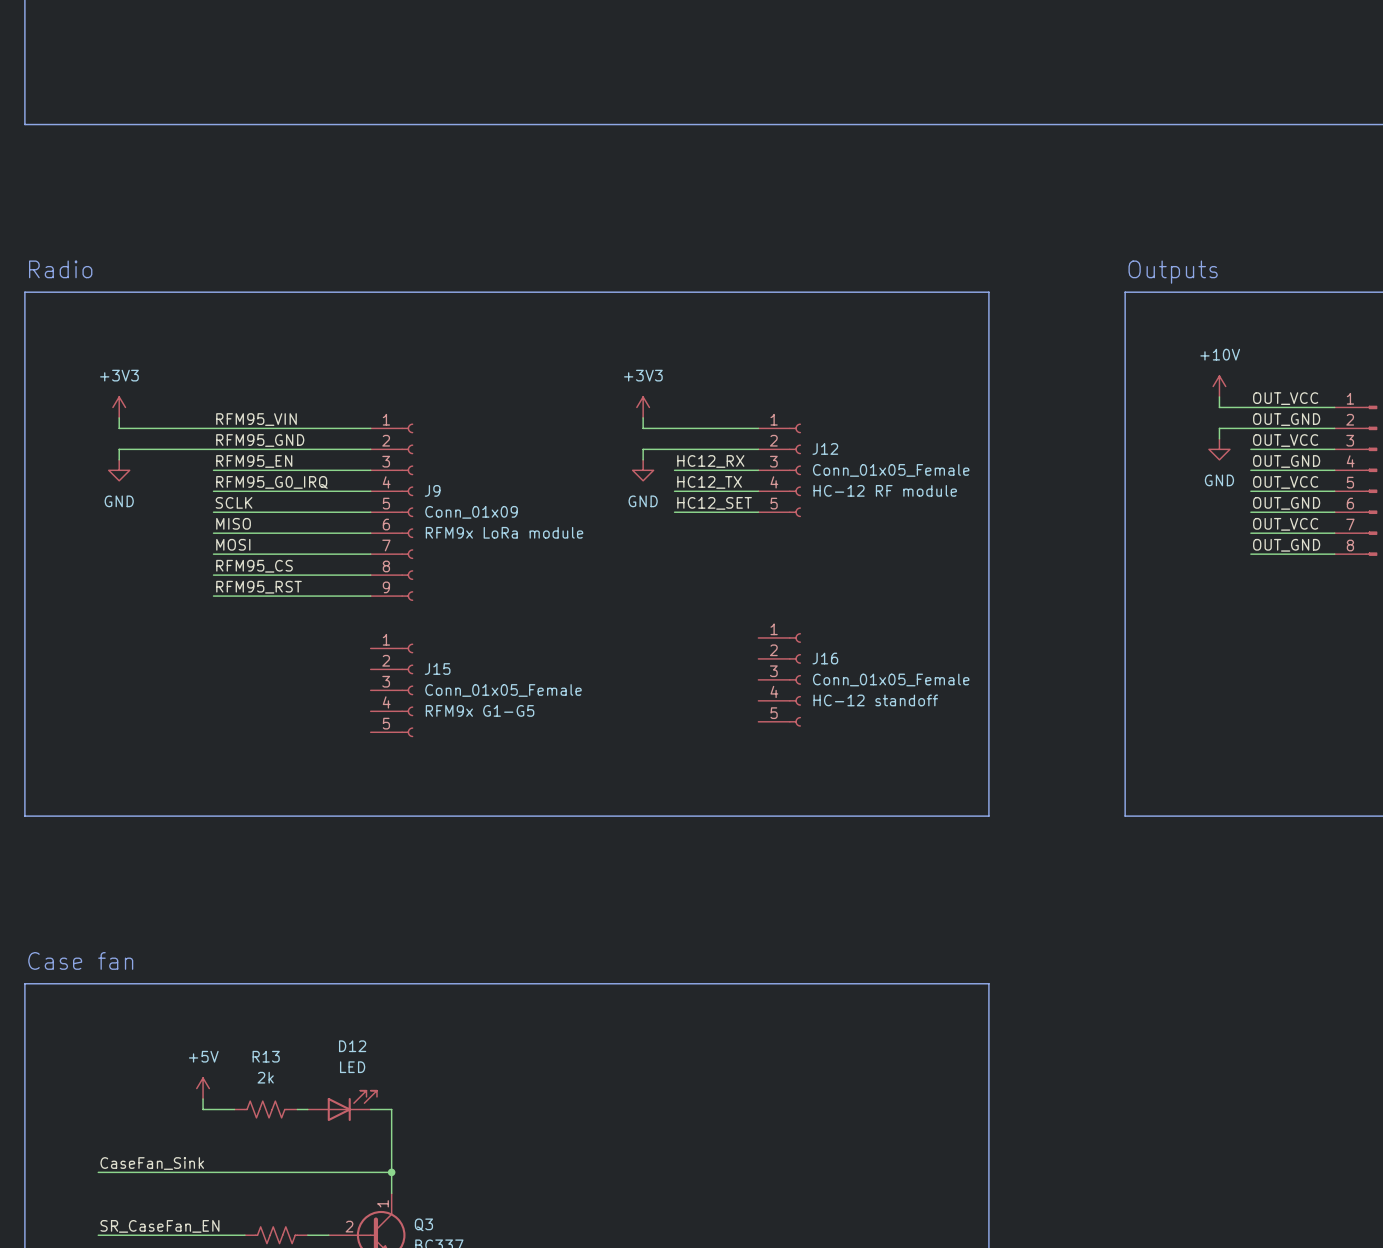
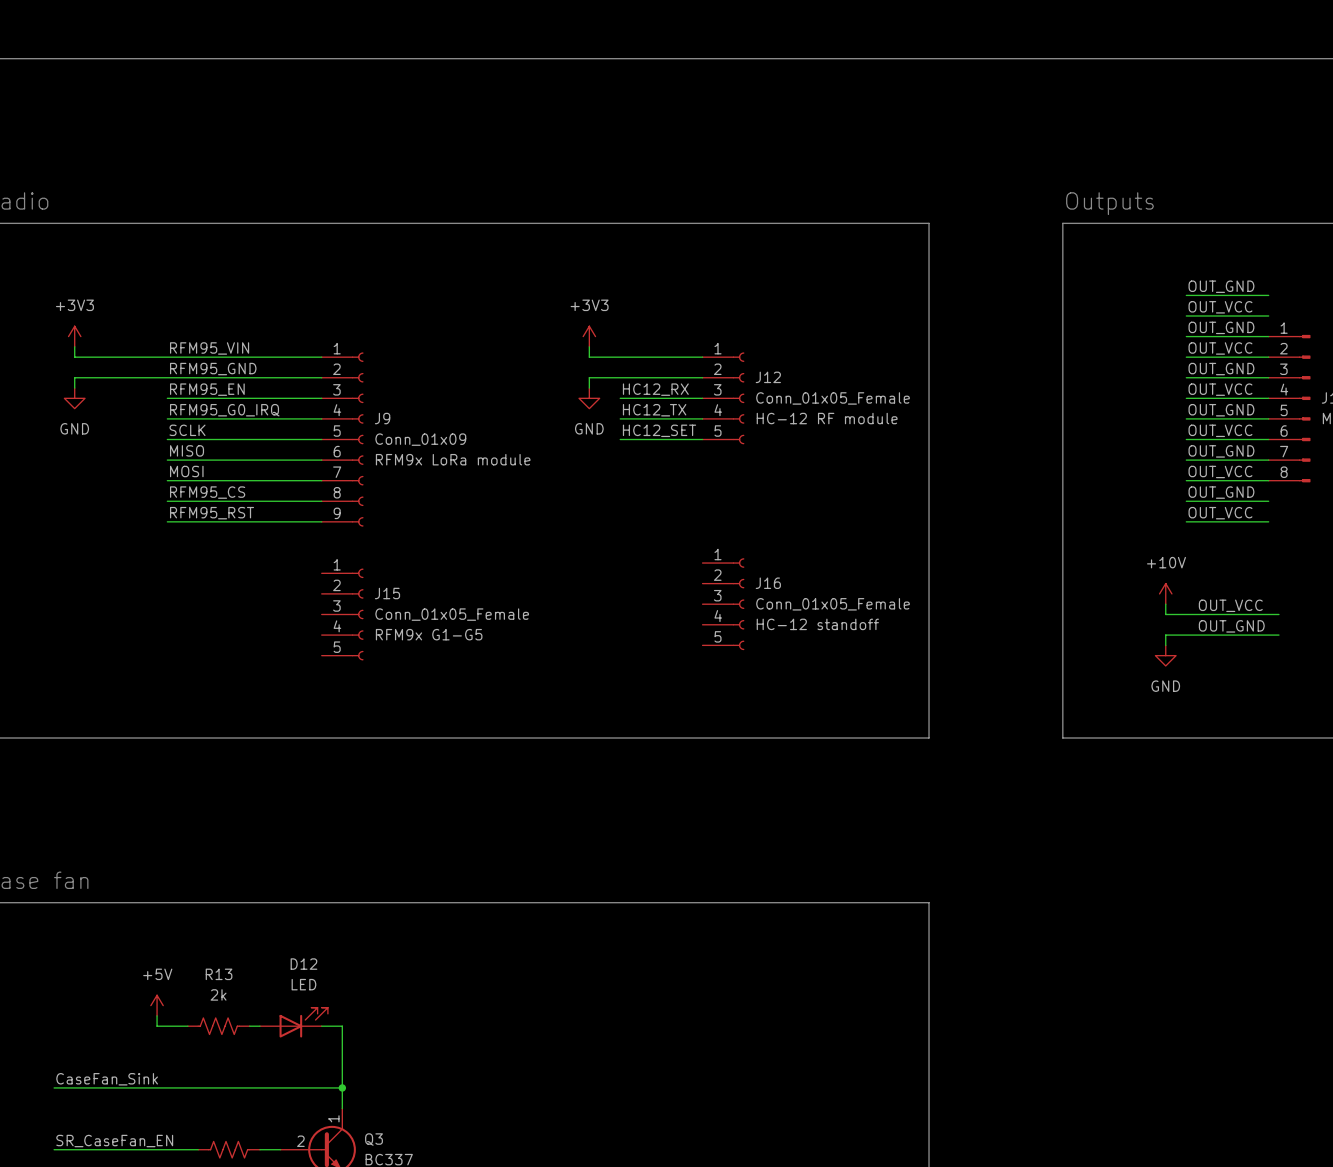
label: none -> OUT_GND (1221, 286)
wire: none -> (1186, 295) (1268, 295)
label: none -> OUT_VCC (1220, 307)
power symbol: +10V (1219, 386) -> none
wire: none -> (1186, 315) (1268, 315)
wire: (1219, 396) (1219, 407) (1250, 407) -> none
label: OUT_VCC (1285, 398) -> OUT_GND (1221, 327)
label: OUT_GND (1286, 419) -> OUT_VCC (1220, 348)
wire: (1250, 428) (1219, 428) (1219, 438) -> none
label: OUT_VCC (1285, 440) -> OUT_GND (1221, 369)
power symbol: GND (1219, 449) -> none
label: OUT_GND (1286, 461) -> OUT_VCC (1220, 389)
label: OUT_VCC (1285, 482) -> OUT_GND (1221, 410)
label: OUT_GND (1286, 503) -> OUT_VCC (1220, 430)
label: OUT_VCC (1285, 524) -> OUT_GND (1221, 451)
label: OUT_GND (1286, 545) -> OUT_VCC (1220, 471)
label: none -> OUT_GND (1221, 492)
wire: none -> (1186, 501) (1268, 501)
label: none -> OUT_VCC (1220, 513)
wire: none -> (1186, 521) (1268, 521)
power symbol: none -> +10V (1165, 593)
wire: none -> (1165, 604) (1165, 614) (1278, 614)
label: none -> OUT_VCC (1230, 605)
label: none -> OUT_GND (1231, 626)
wire: none -> (1278, 635) (1165, 635) (1165, 645)
power symbol: none -> GND (1165, 655)

